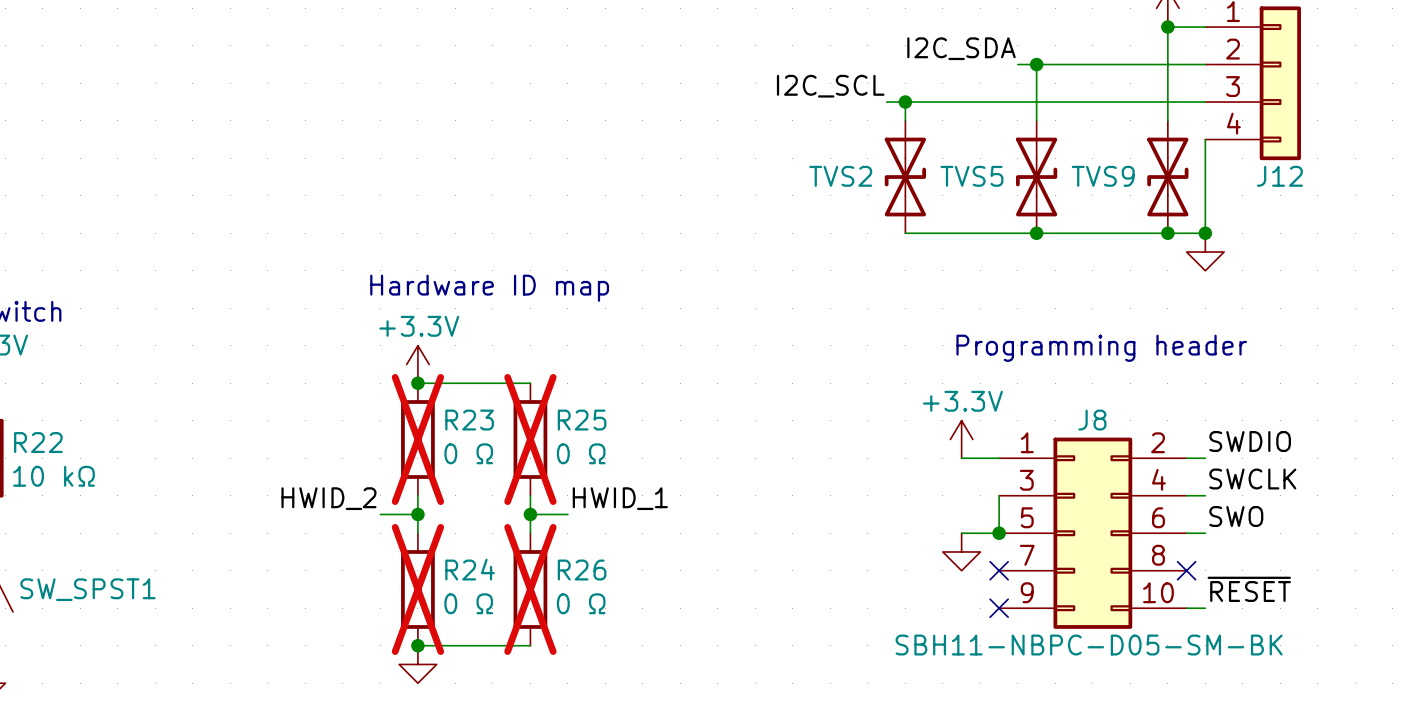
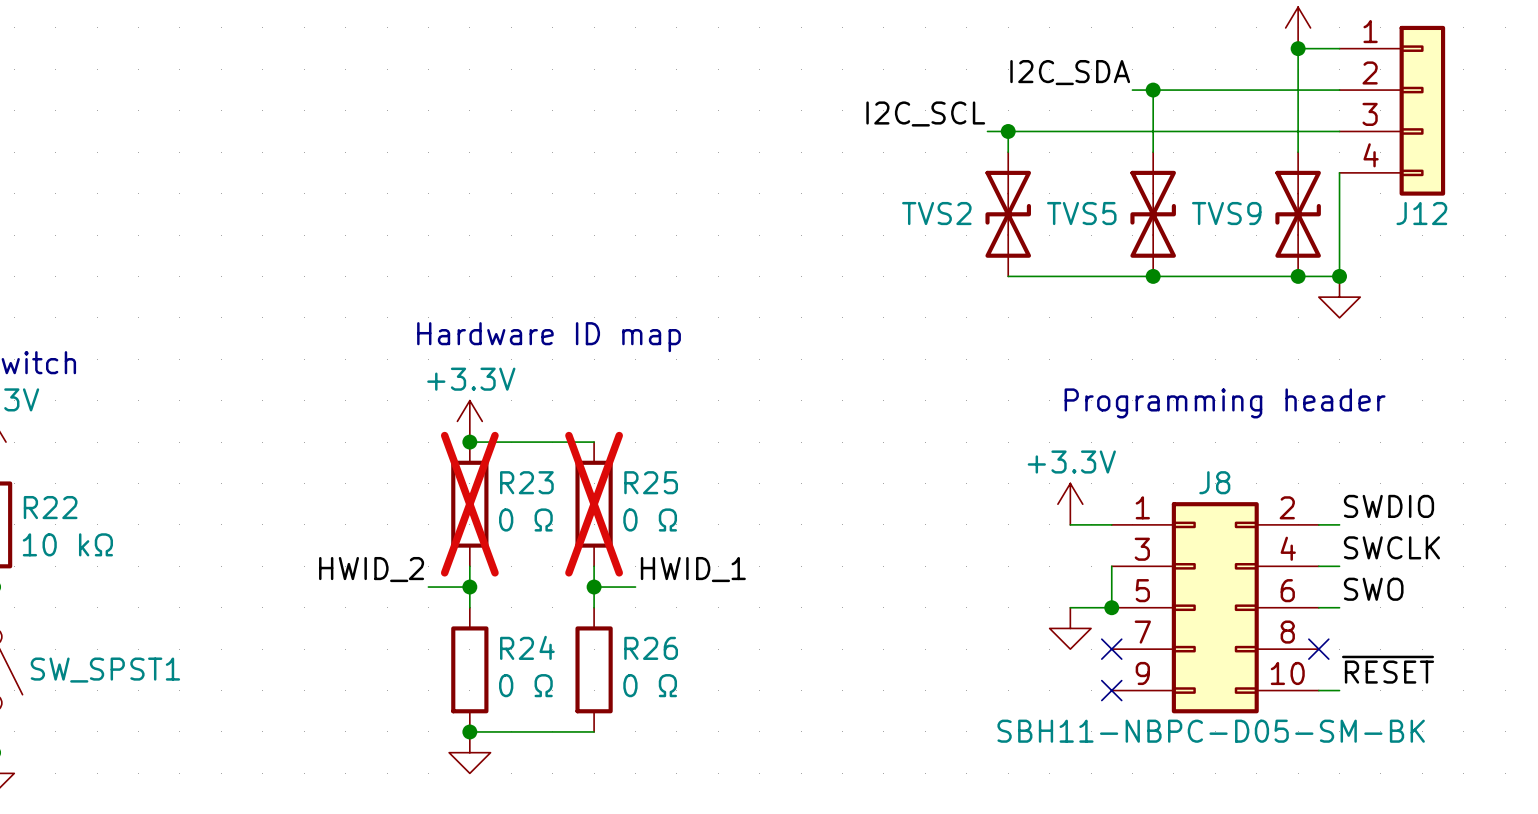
R24 do-not-place cross: (417, 589) -> none
R26 do-not-place cross: (530, 589) -> none

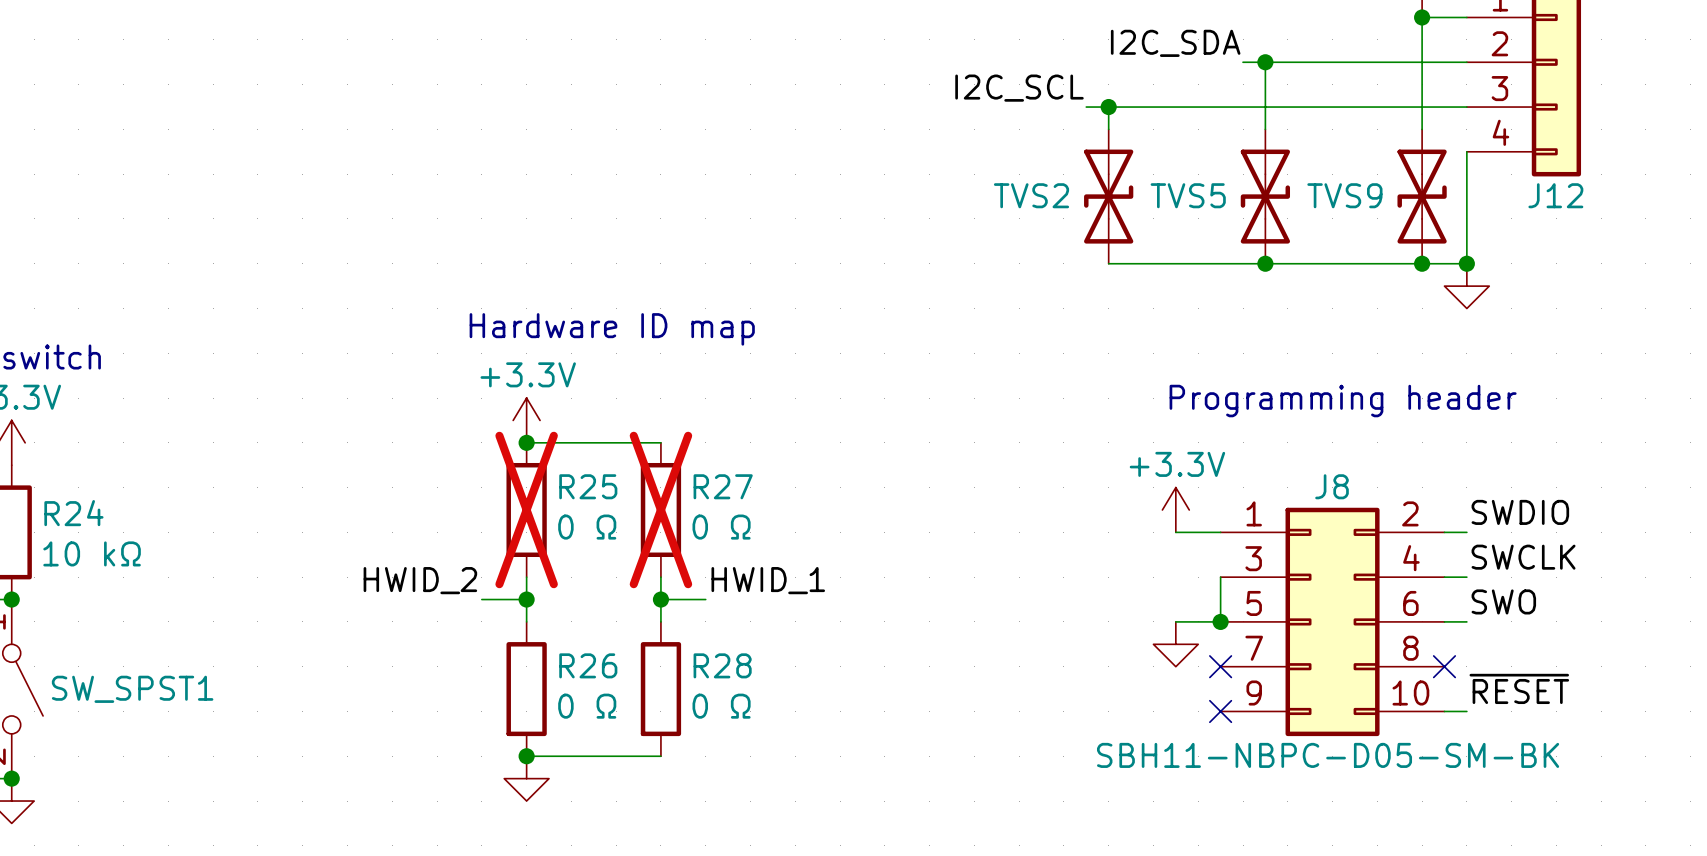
R23 name: R23 (526, 482) -> R25 (588, 486)
R25 name: R25 (651, 482) -> R27 (723, 486)
R22 name: R22 (50, 507) -> R24 (73, 513)
R24 name: R24 (527, 647) -> R26 (588, 665)
R26 name: R26 (651, 648) -> R28 (722, 665)

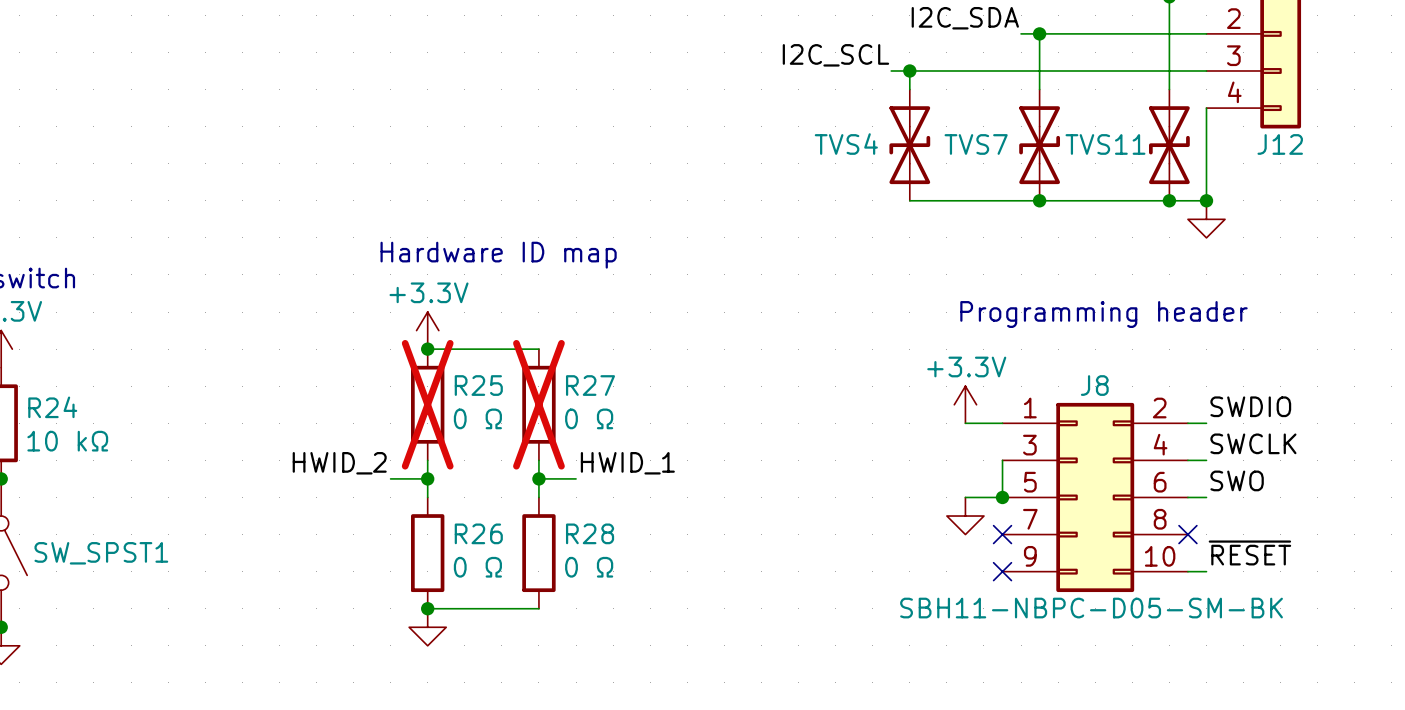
TVS2 name: TVS2 (1031, 195) -> TVS4 (846, 144)
TVS5 name: TVS5 (1188, 195) -> TVS7 (976, 144)
TVS9 name: TVS9 (1344, 195) -> TVS11 (1105, 144)

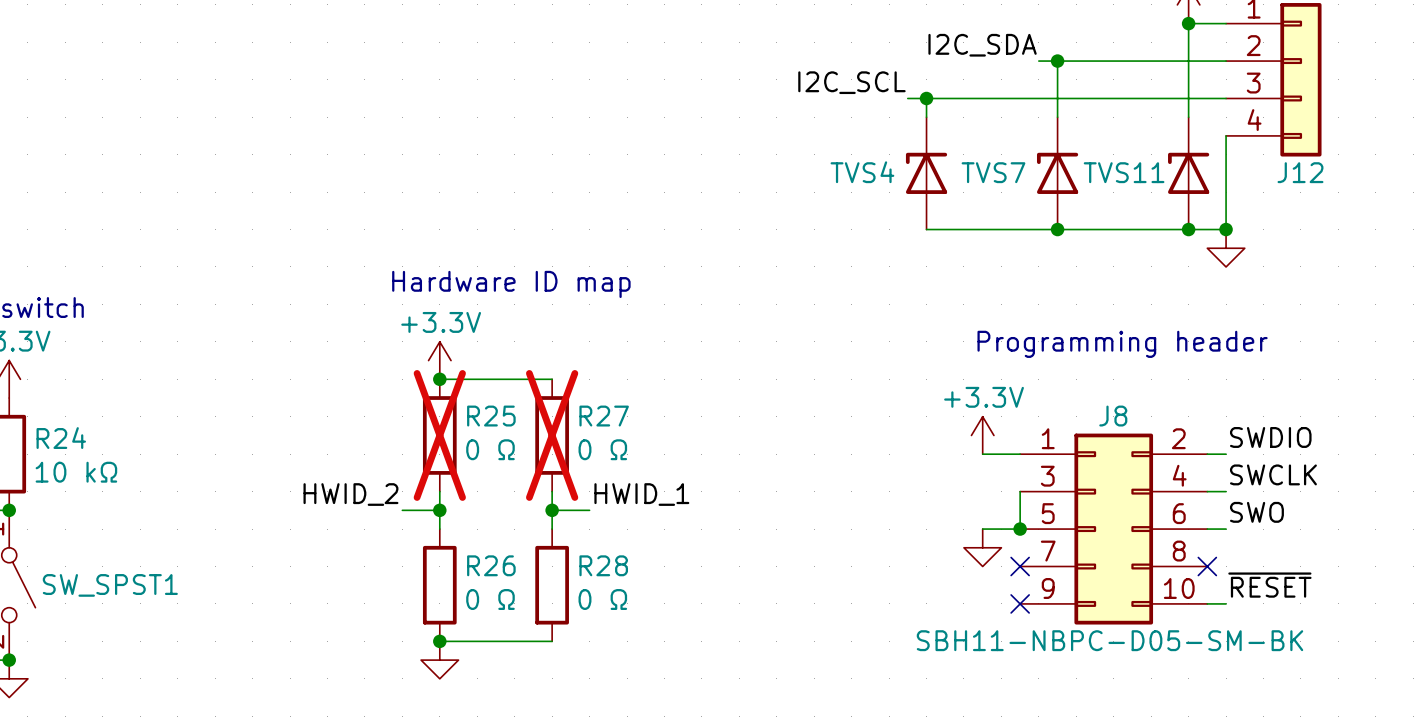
TVS4 symbol: [889, 89, 931, 201] -> [905, 117, 948, 230]
TVS7 symbol: [1019, 89, 1061, 201] -> [1036, 117, 1079, 230]
TVS11 symbol: [1149, 89, 1190, 201] -> [1168, 117, 1210, 230]

